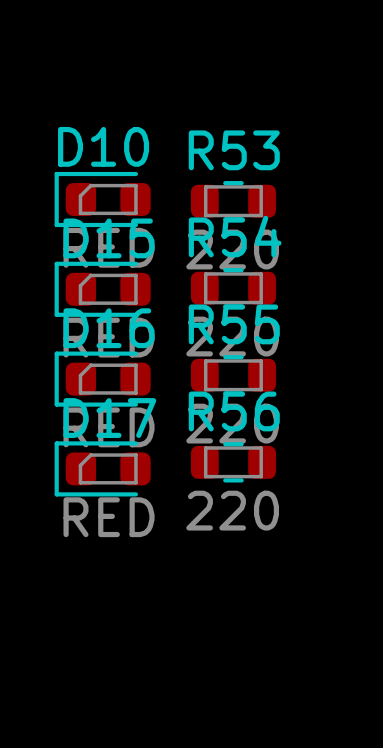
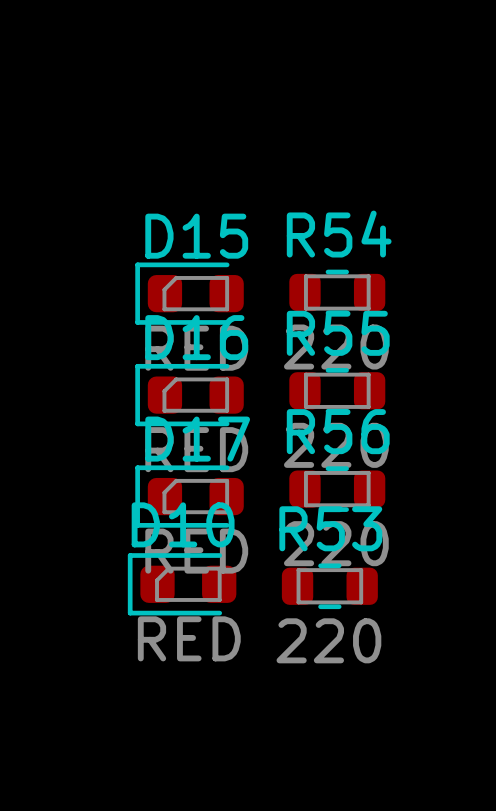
D10 position: (102, 199) -> (182, 584)
R53 position: (233, 201) -> (329, 586)

